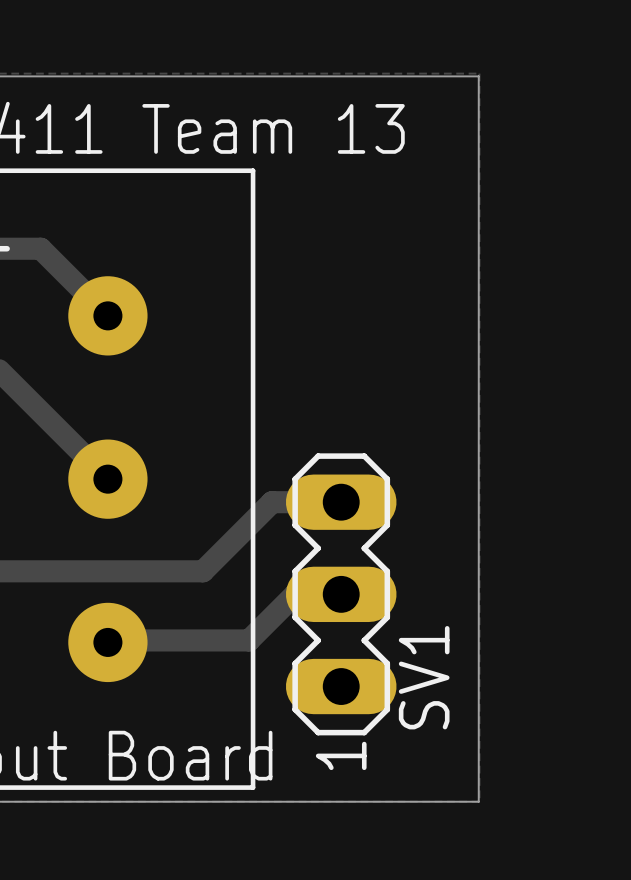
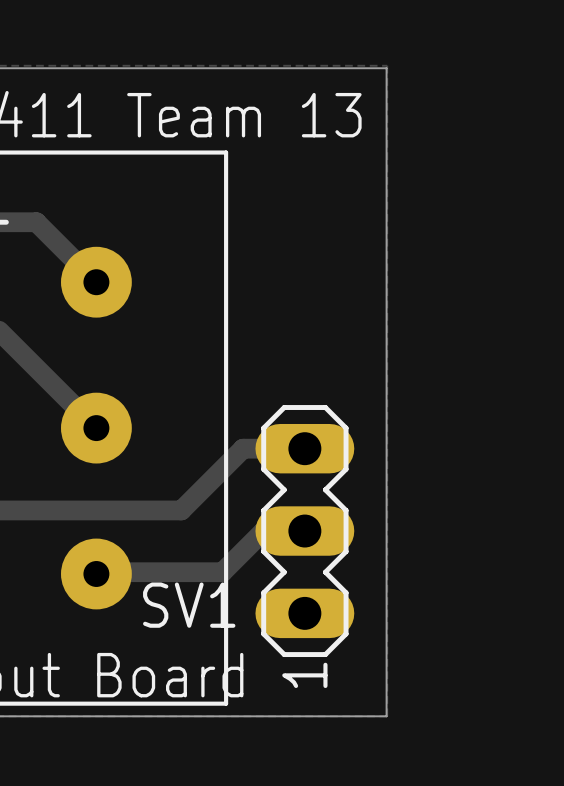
board edge: (432, 76) (478, 76) (478, 801) (432, 801) -> (386, 68) (386, 716)
SV1 name rotation: 0° (424, 677) -> 90° clockwise (189, 605)
SV1 name position: SV1 (424, 677) -> SV1 (189, 605)

